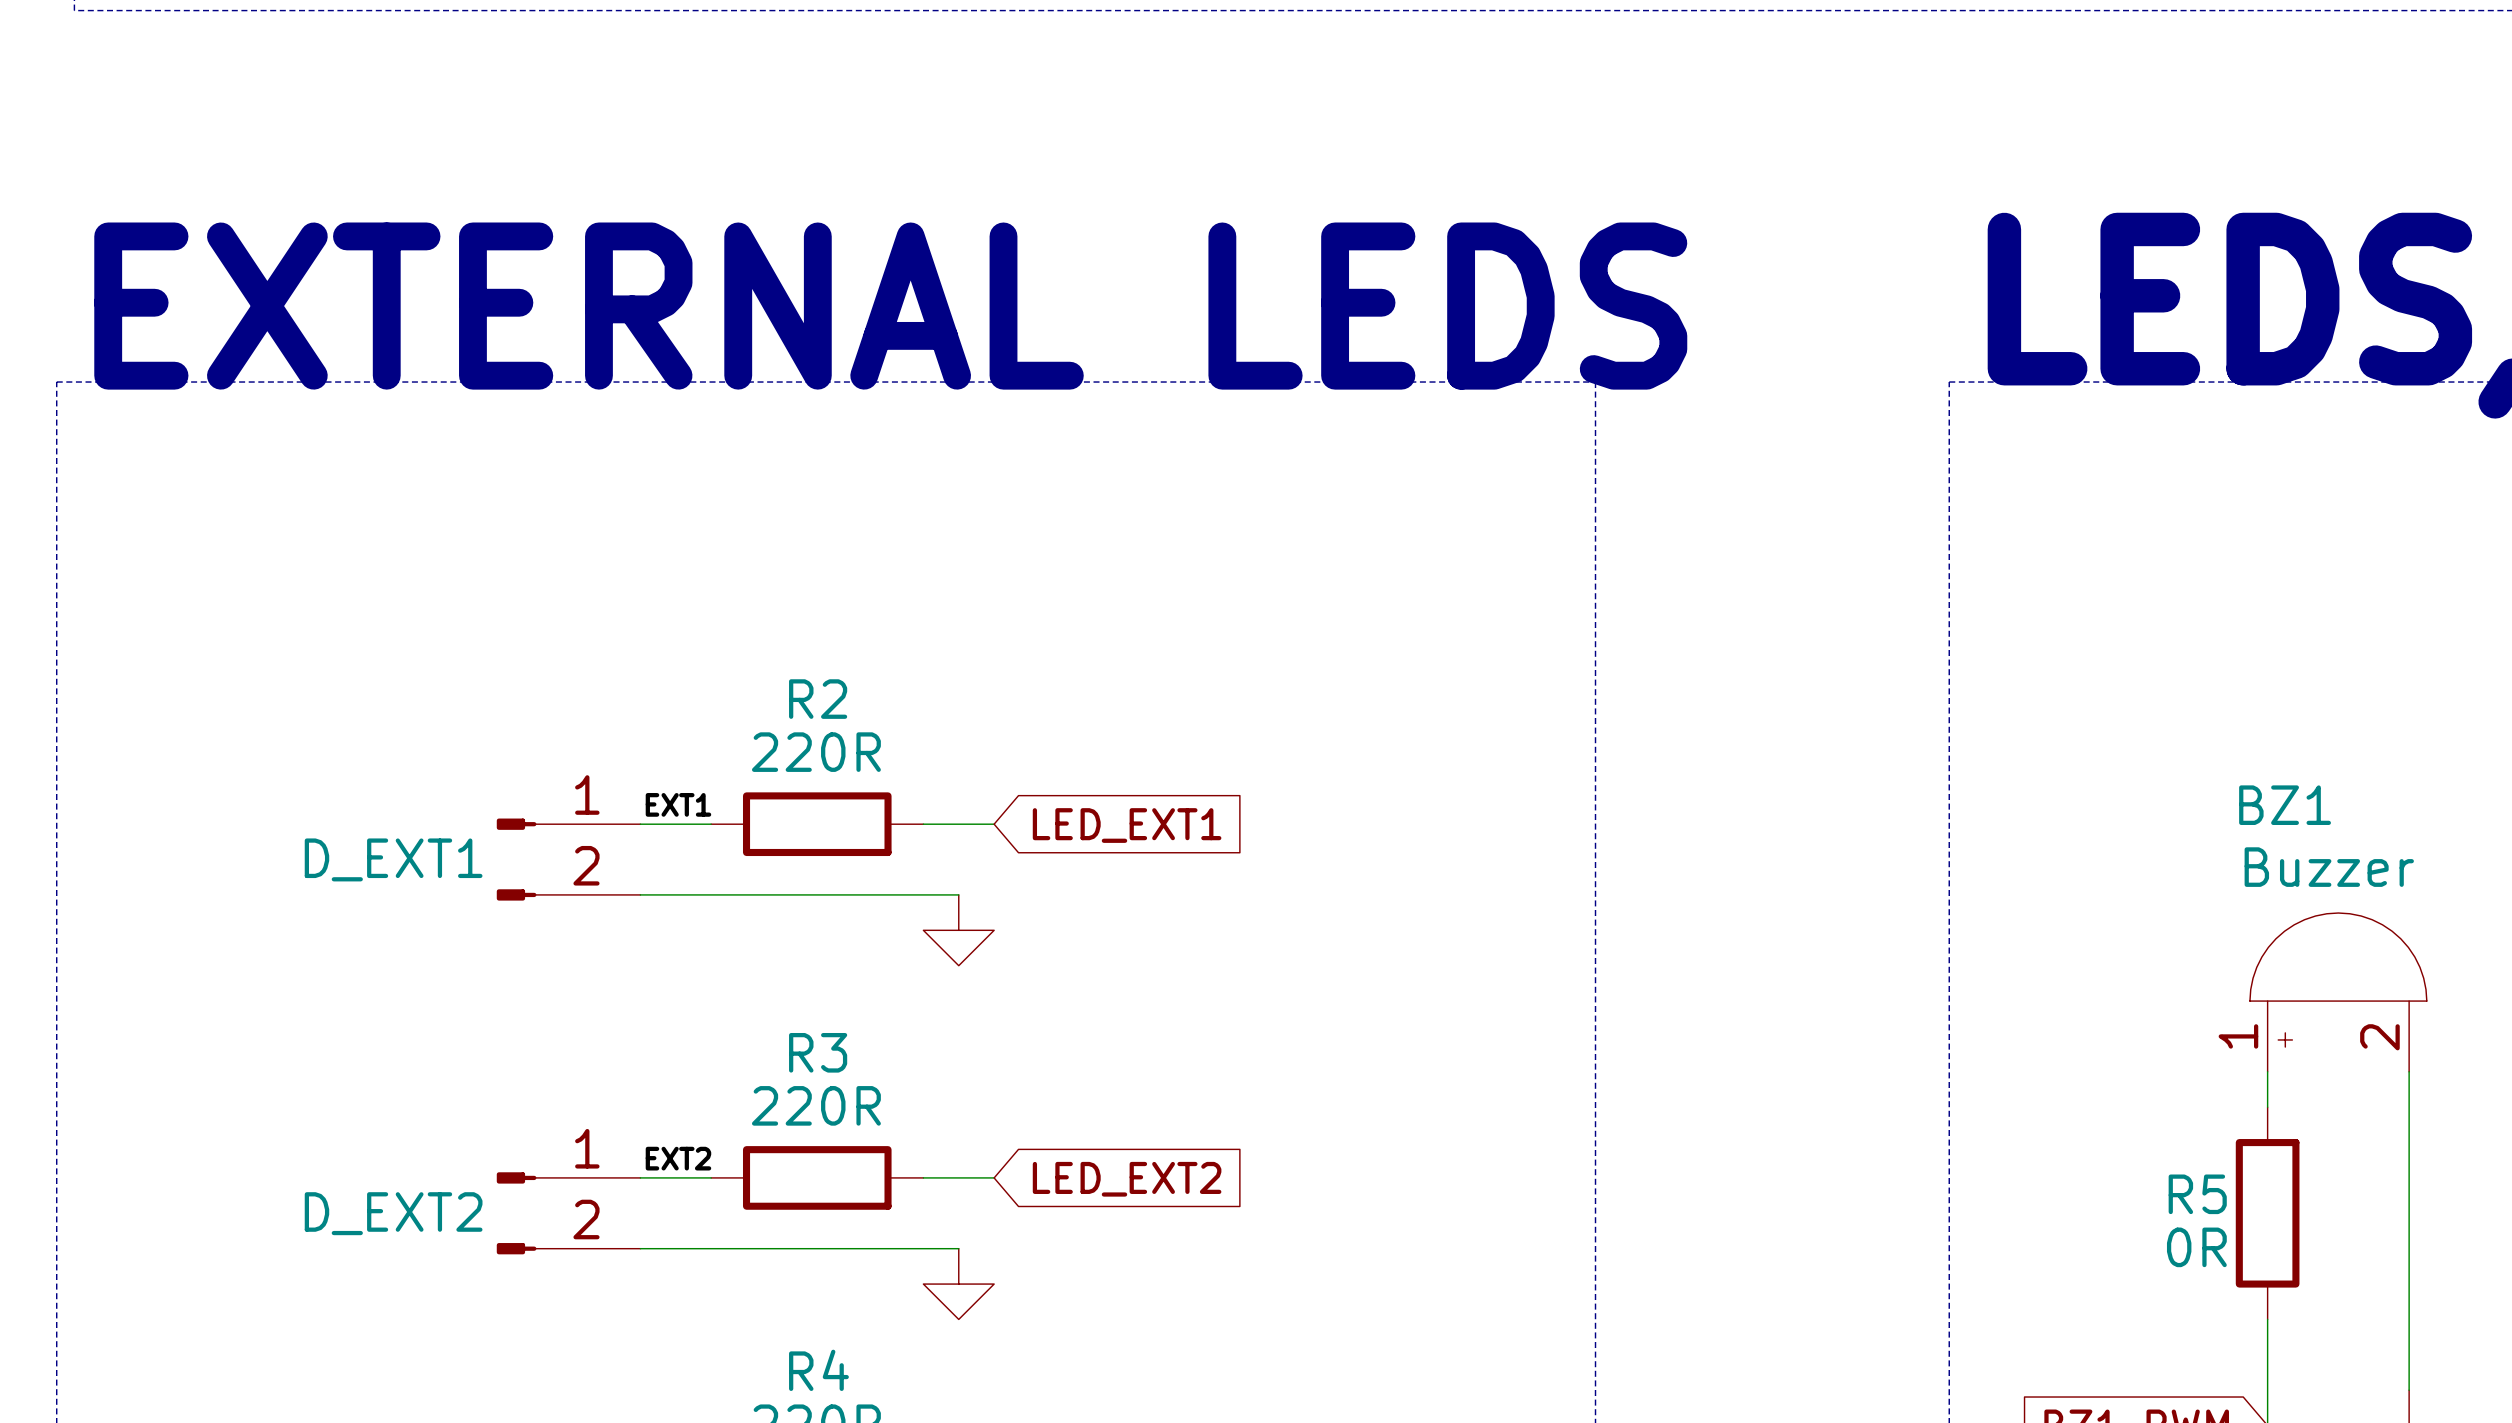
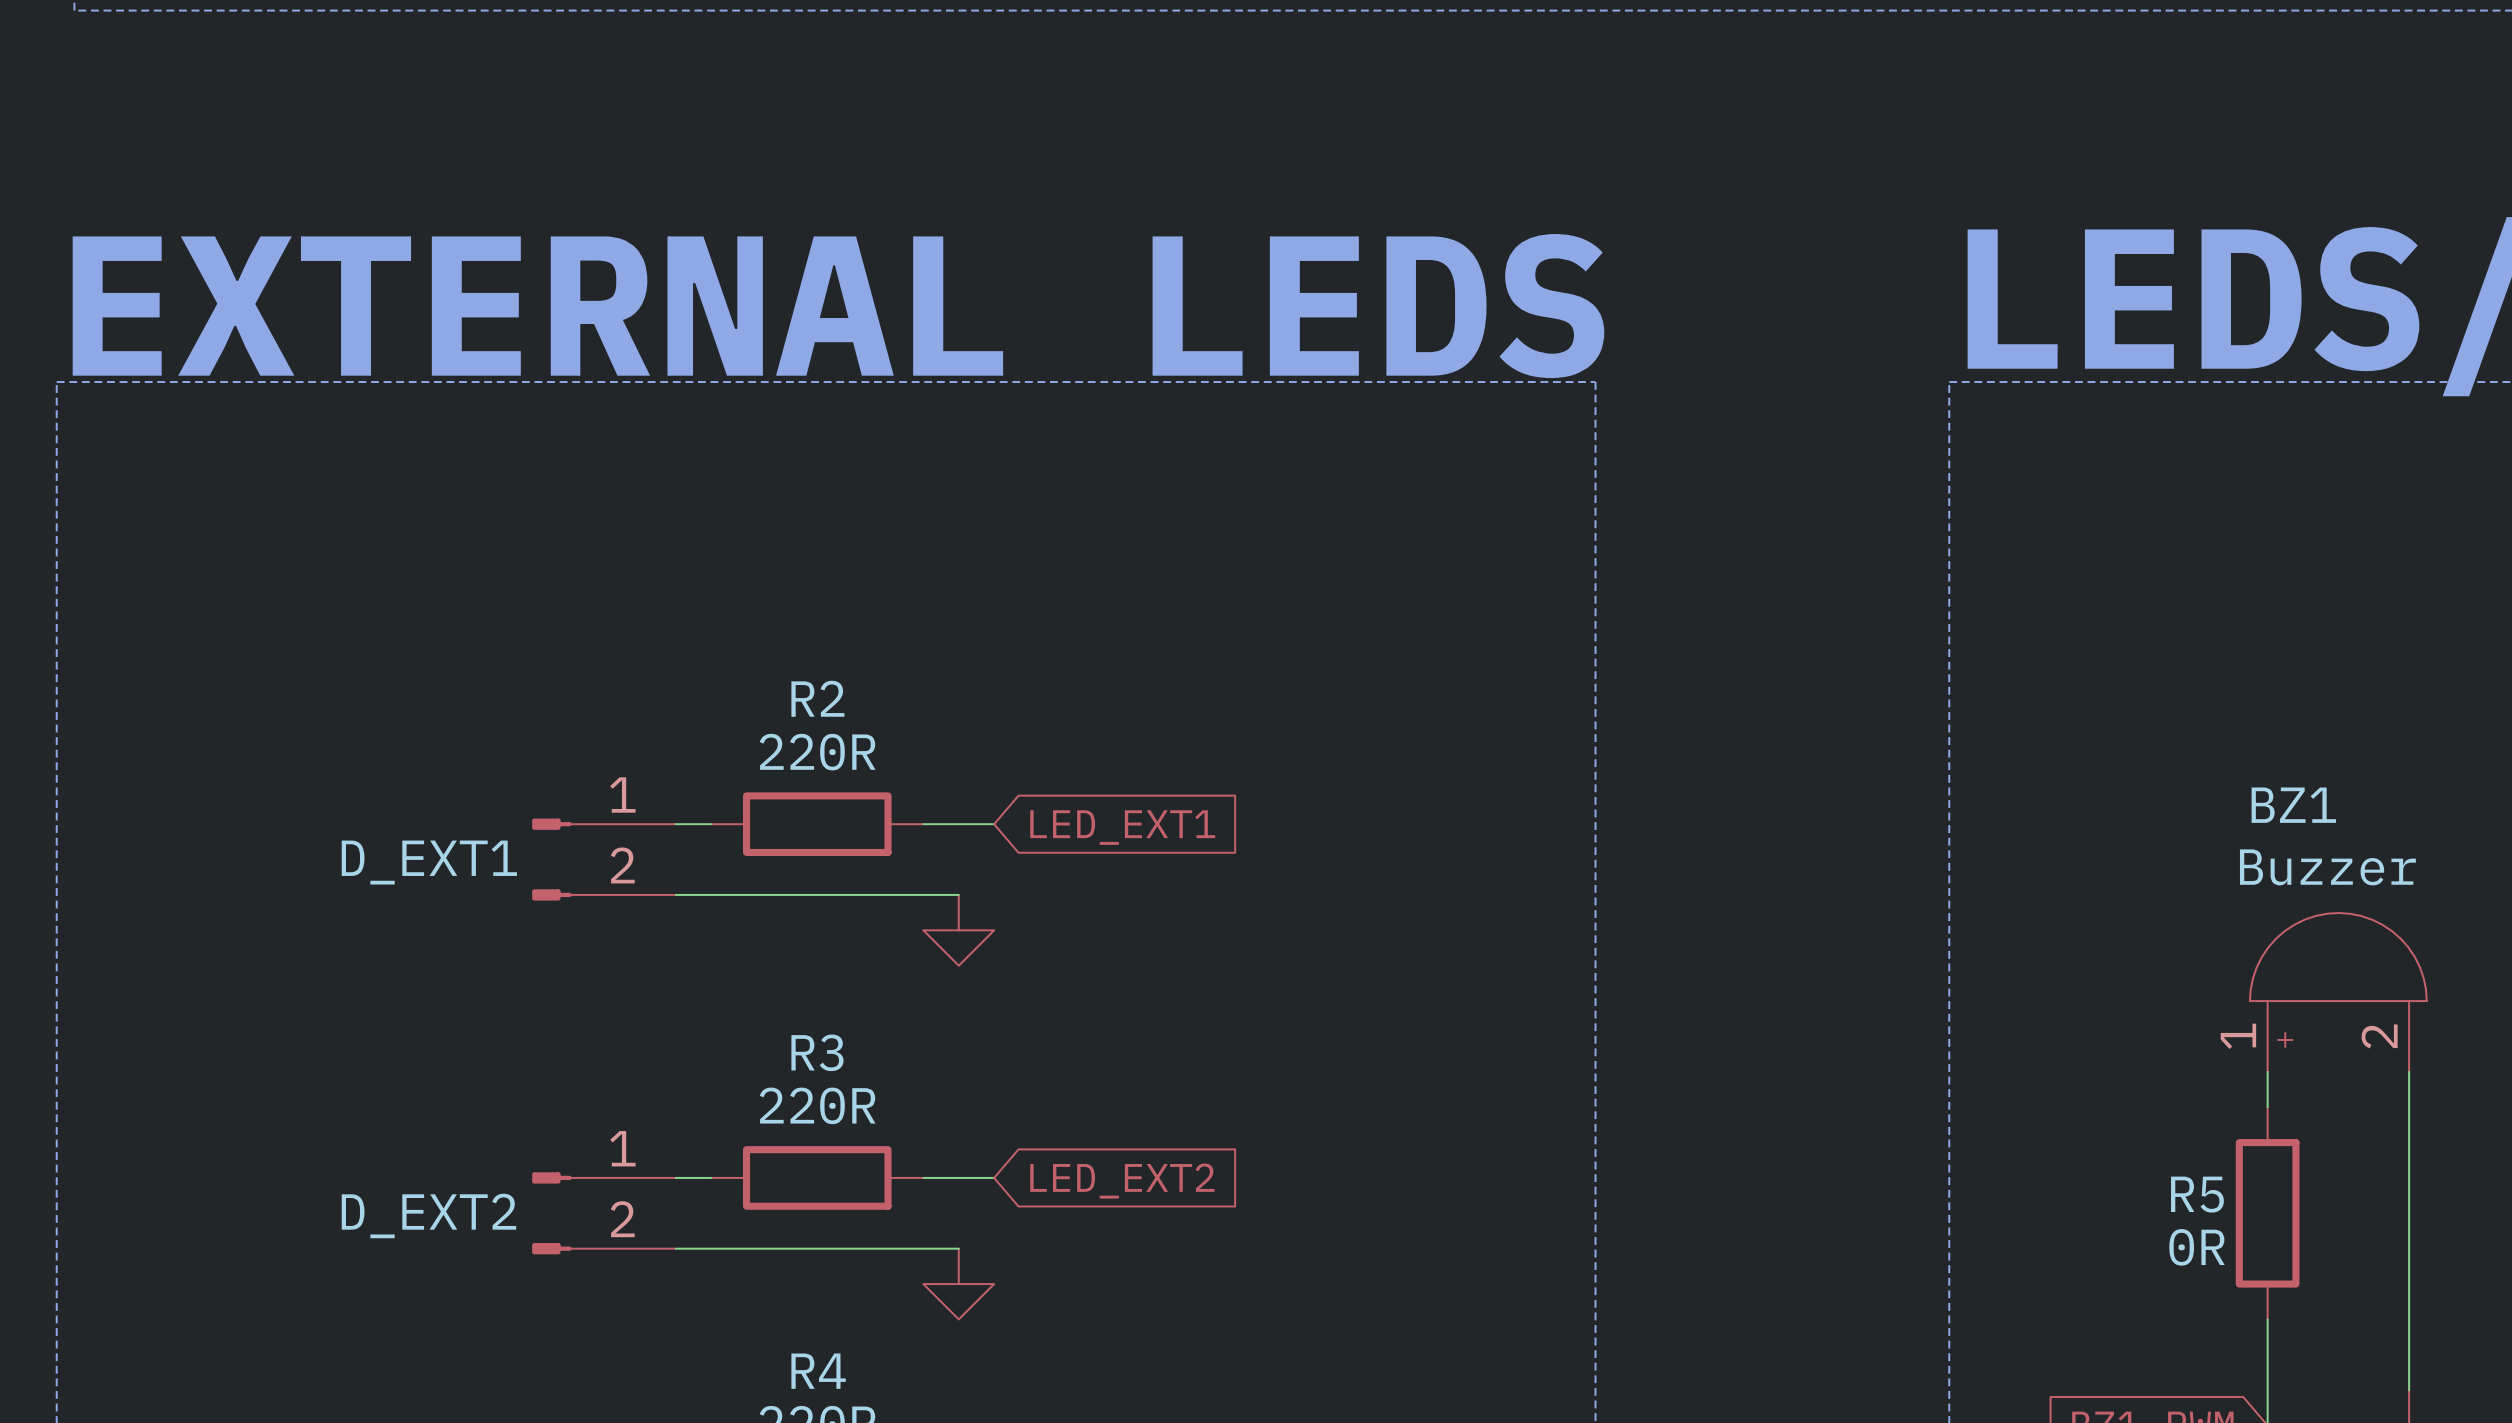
label: EXT1 (678, 804) -> none
D_EXT1 position: (568, 859) -> (603, 859)
label: EXT2 (678, 1158) -> none
D_EXT2 position: (568, 1213) -> (603, 1213)

